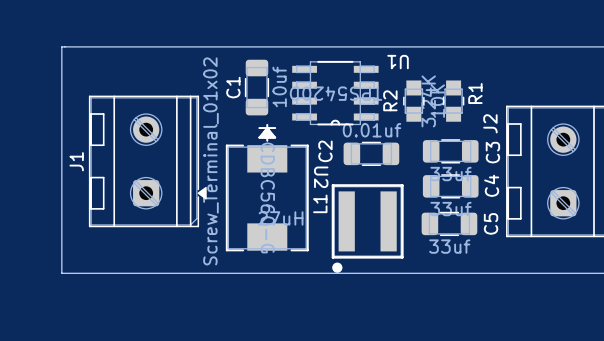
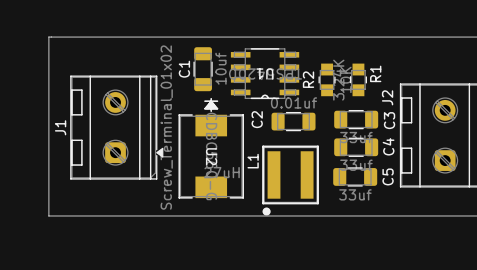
U1 name position: U1 (398, 62) -> U1 (264, 73)
U2 name position: U2 (321, 177) -> U2 (211, 156)

